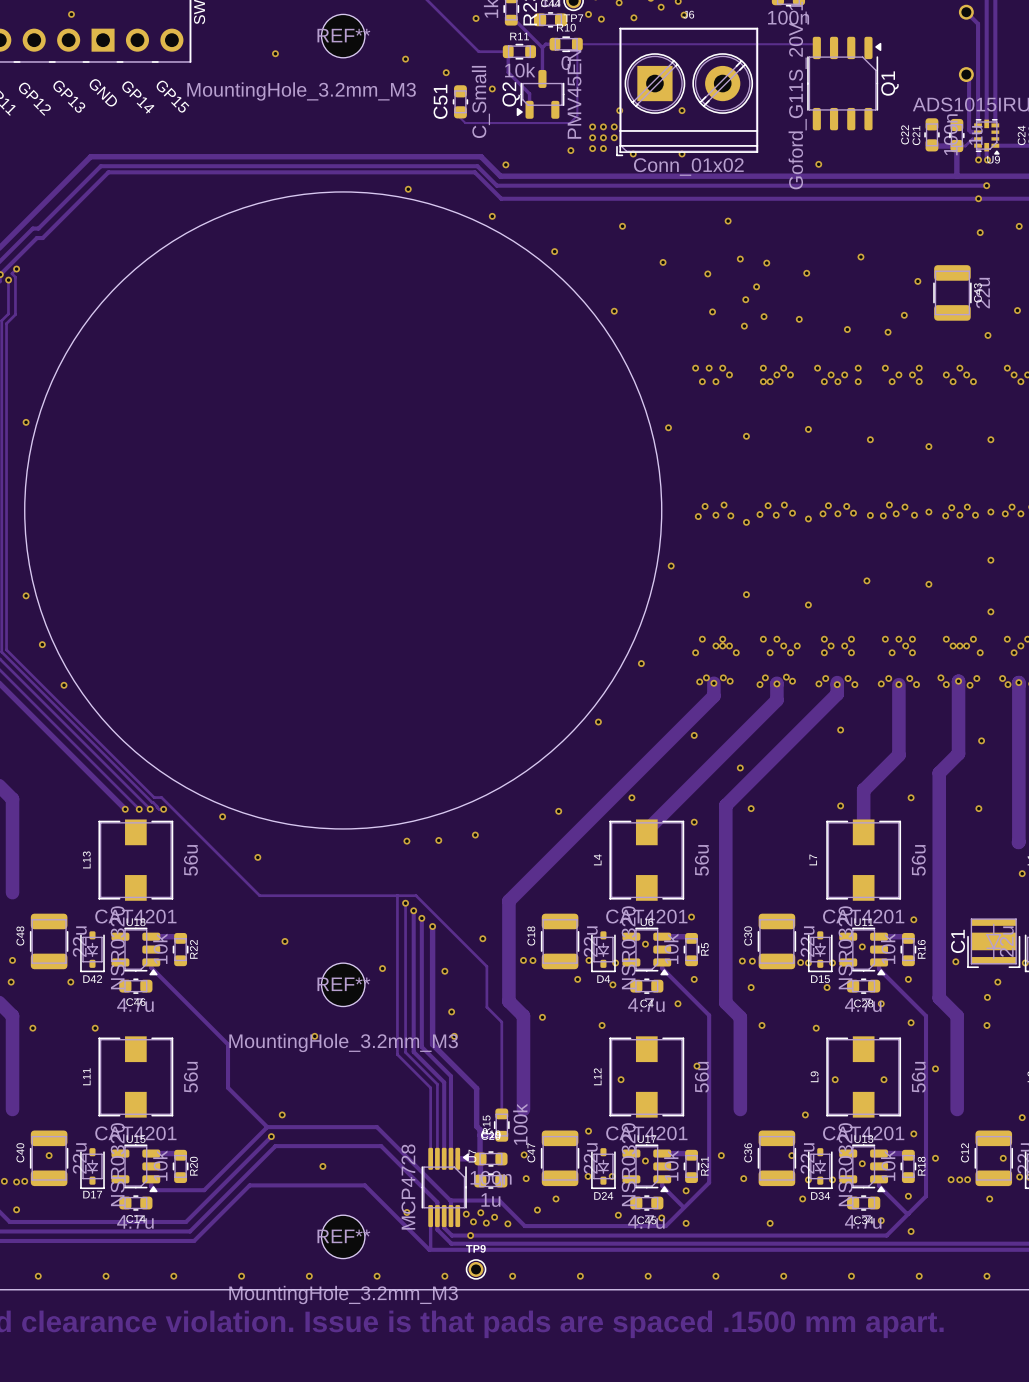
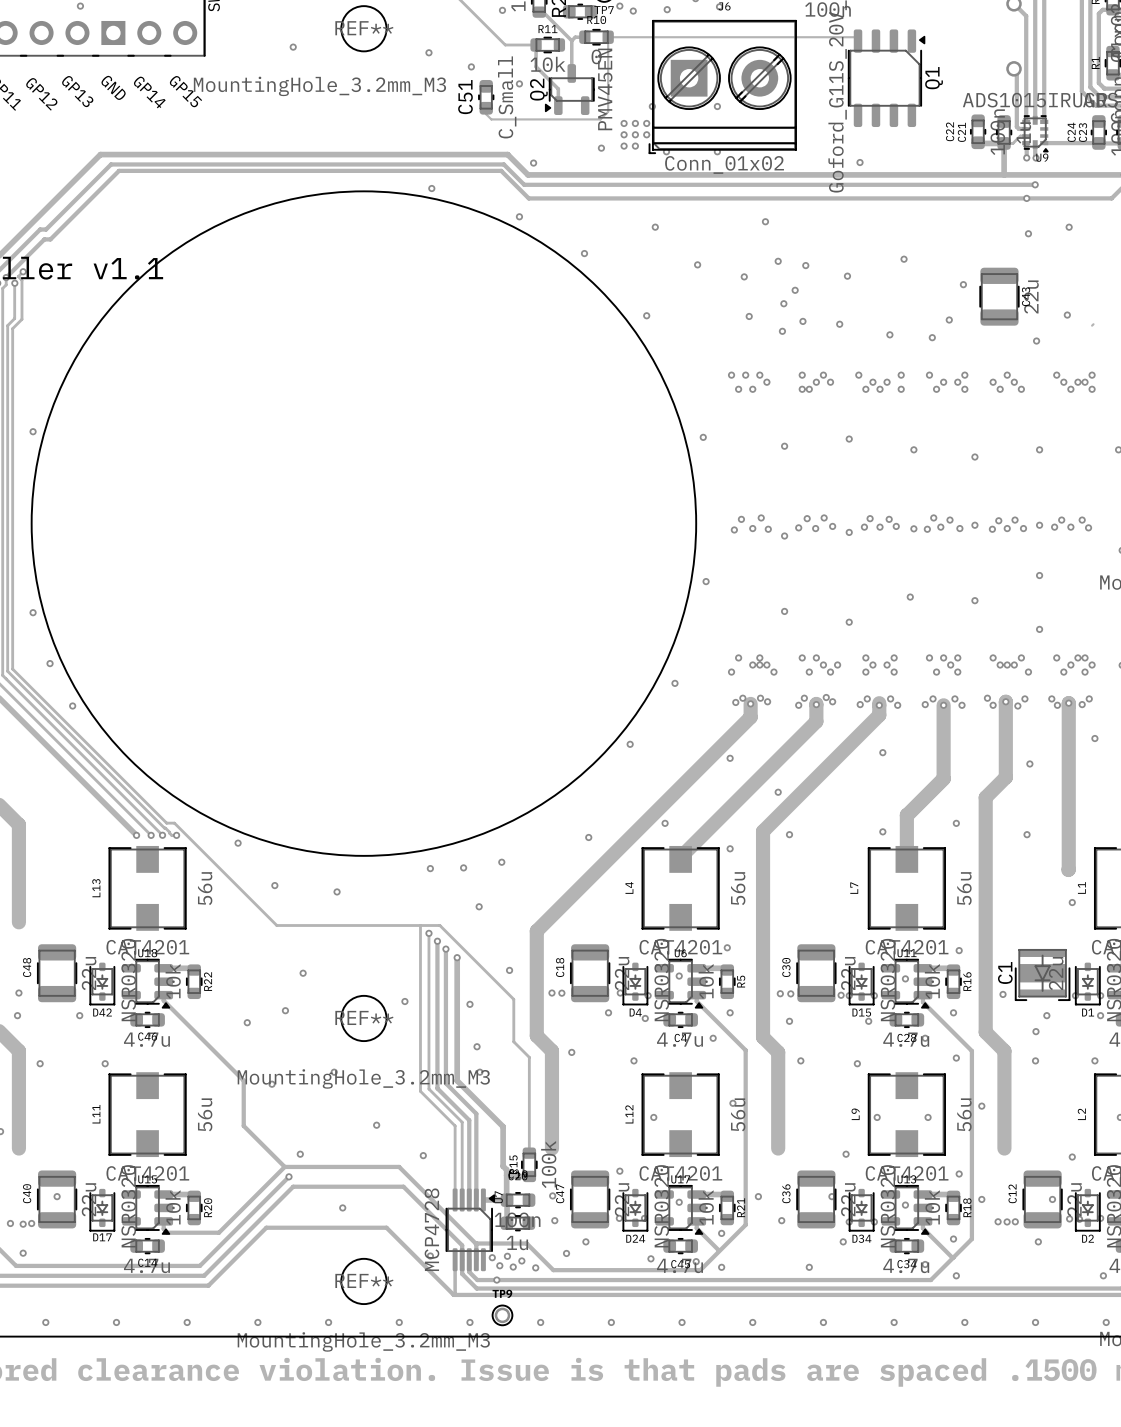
via: none -> (337, 891)
via: none -> (479, 906)
via: none -> (285, 1010)
via: none -> (247, 1022)
via: none -> (272, 1084)
via: none -> (376, 1125)
via: none -> (423, 1155)

